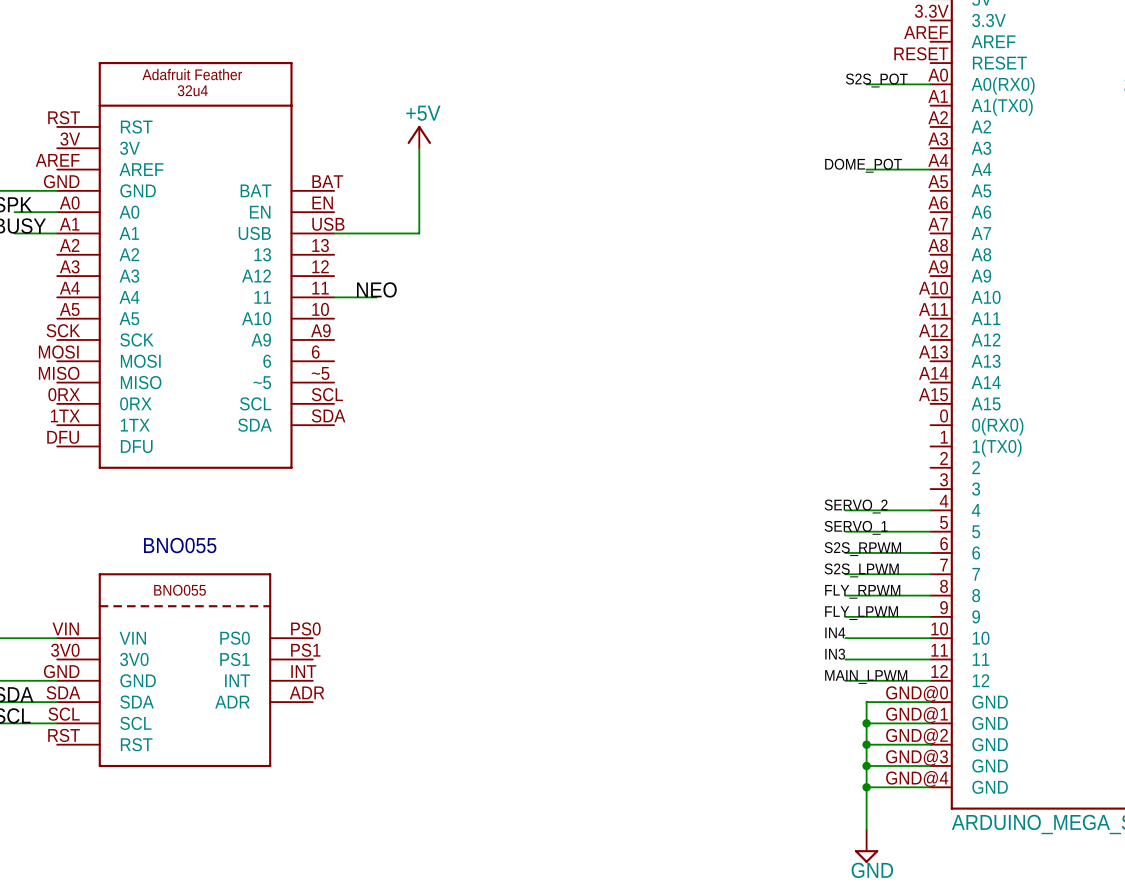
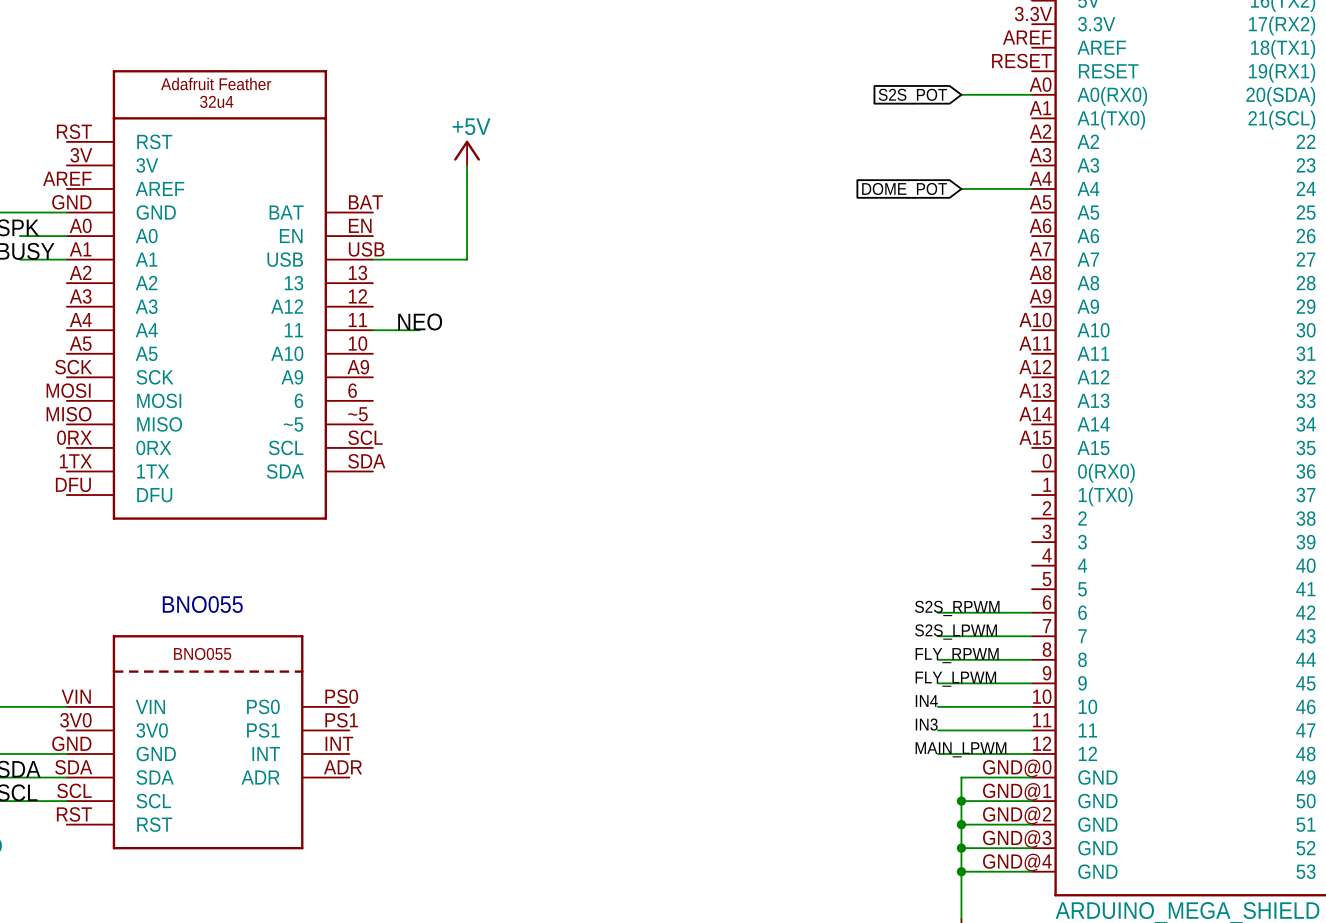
label: S2S_POT (876, 80) -> none
global label: none -> S2S_POT (912, 96)
label: DOME_POT (863, 165) -> none
global label: none -> DOME_POT (904, 190)
label: SERVO_2 (856, 506) -> none
wire: (845, 510) (930, 510) -> none
label: SERVO_1 (856, 527) -> none
wire: (845, 531) (930, 531) -> none

